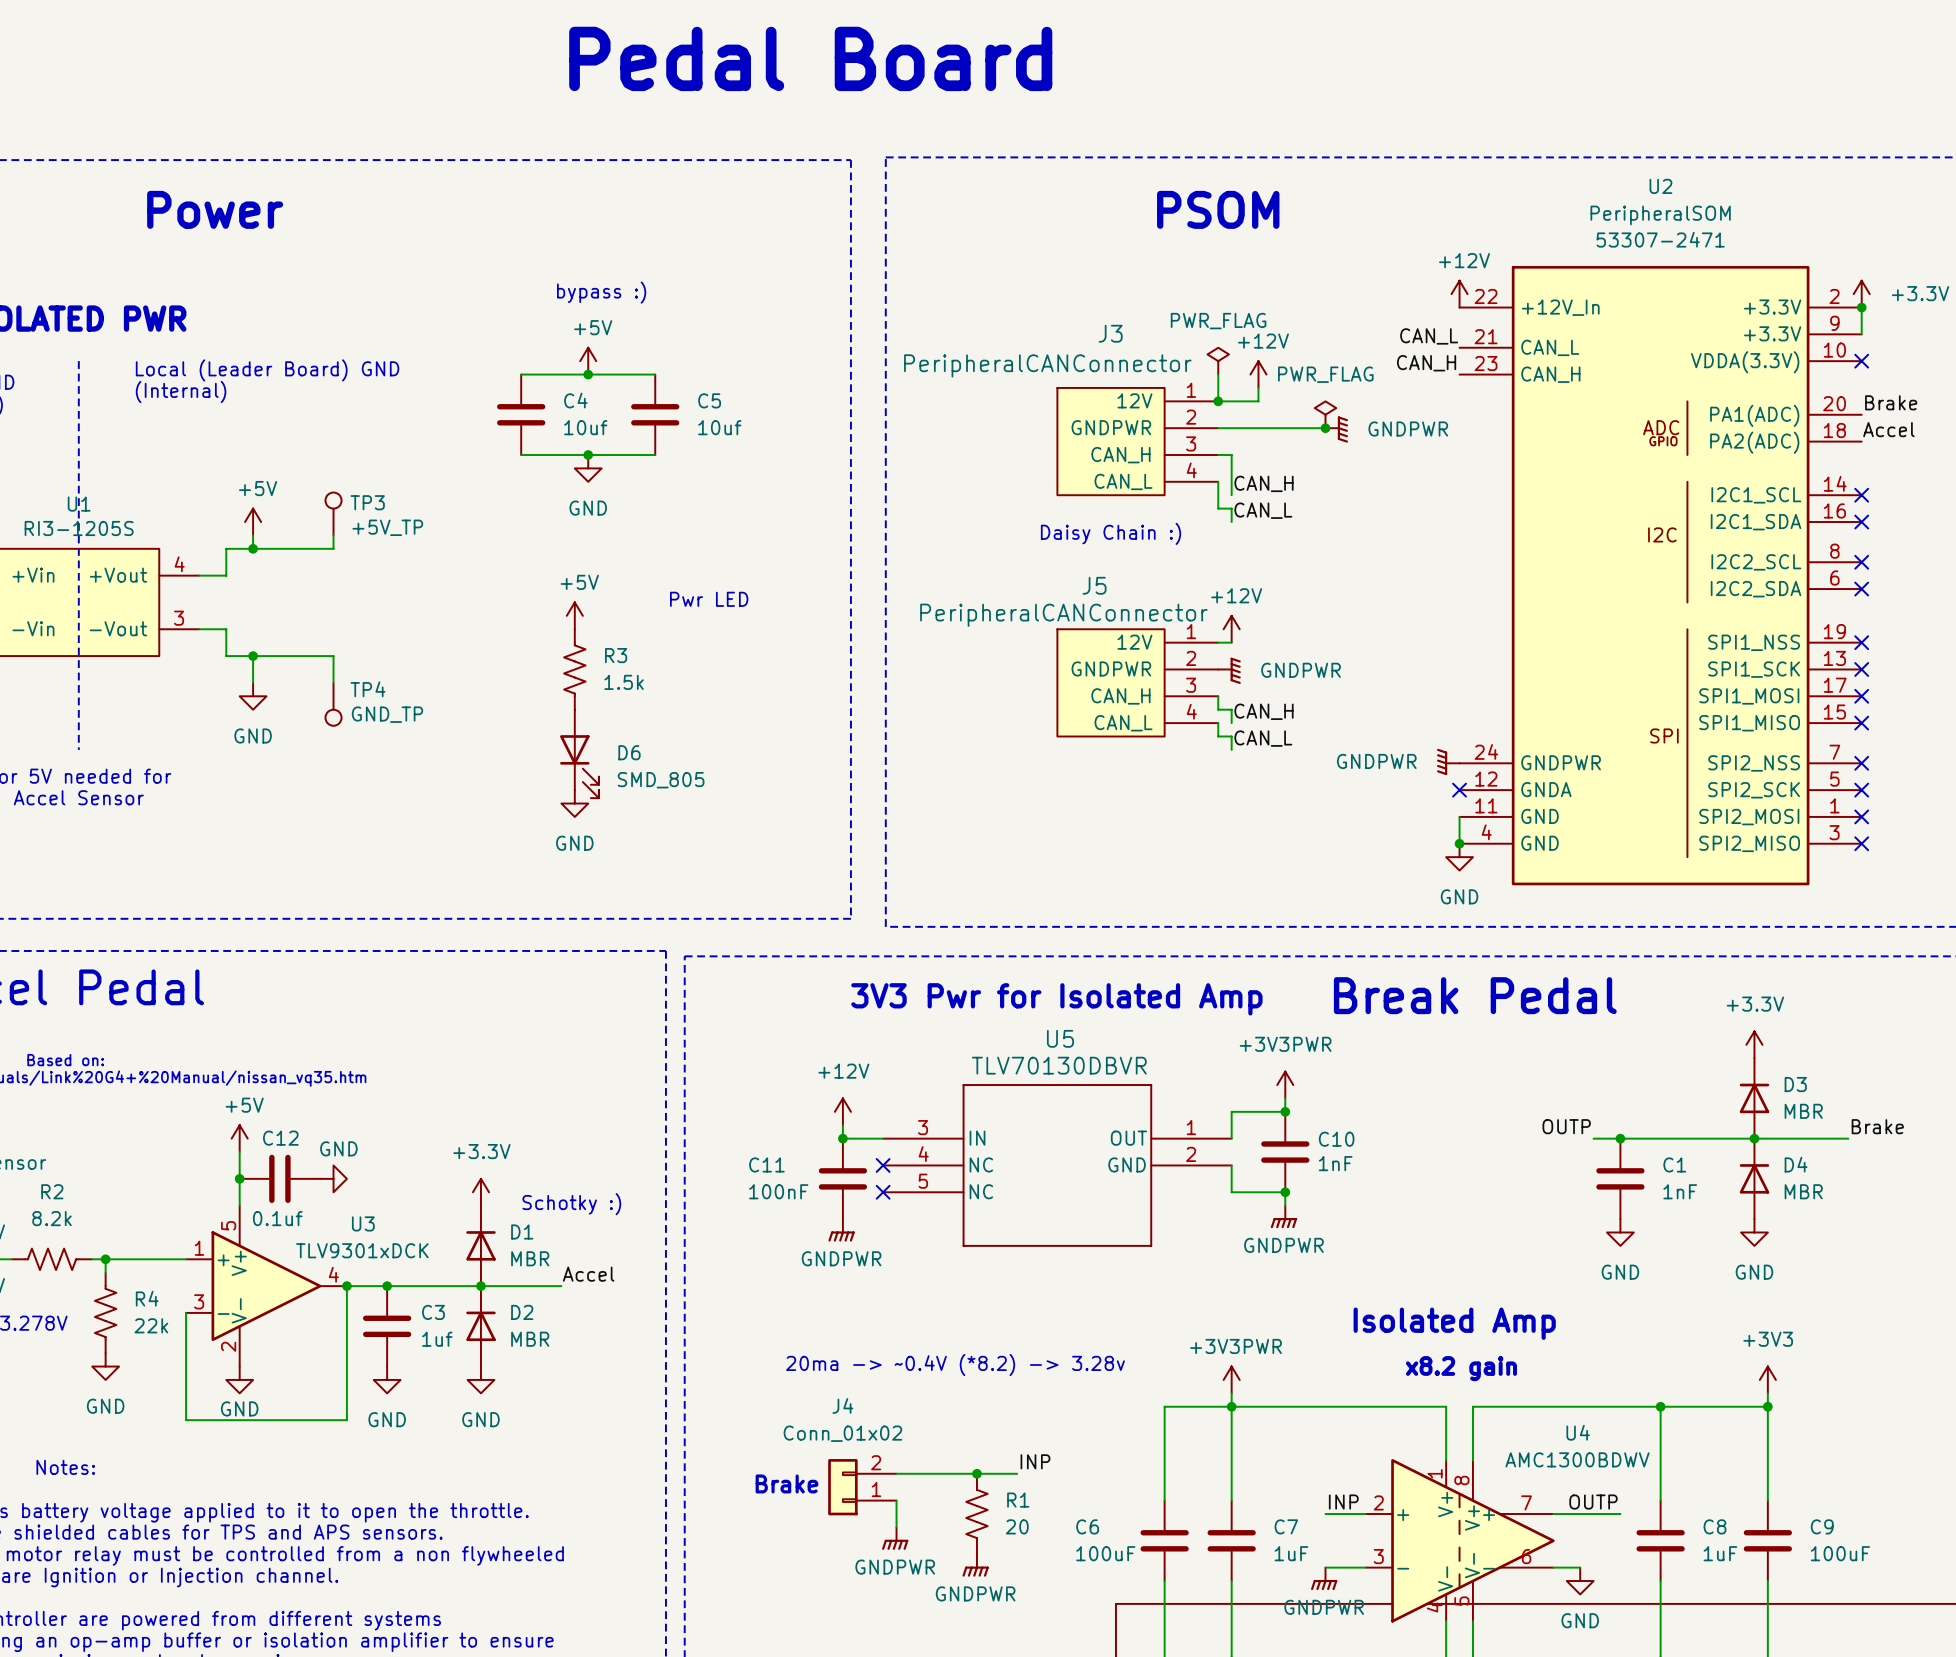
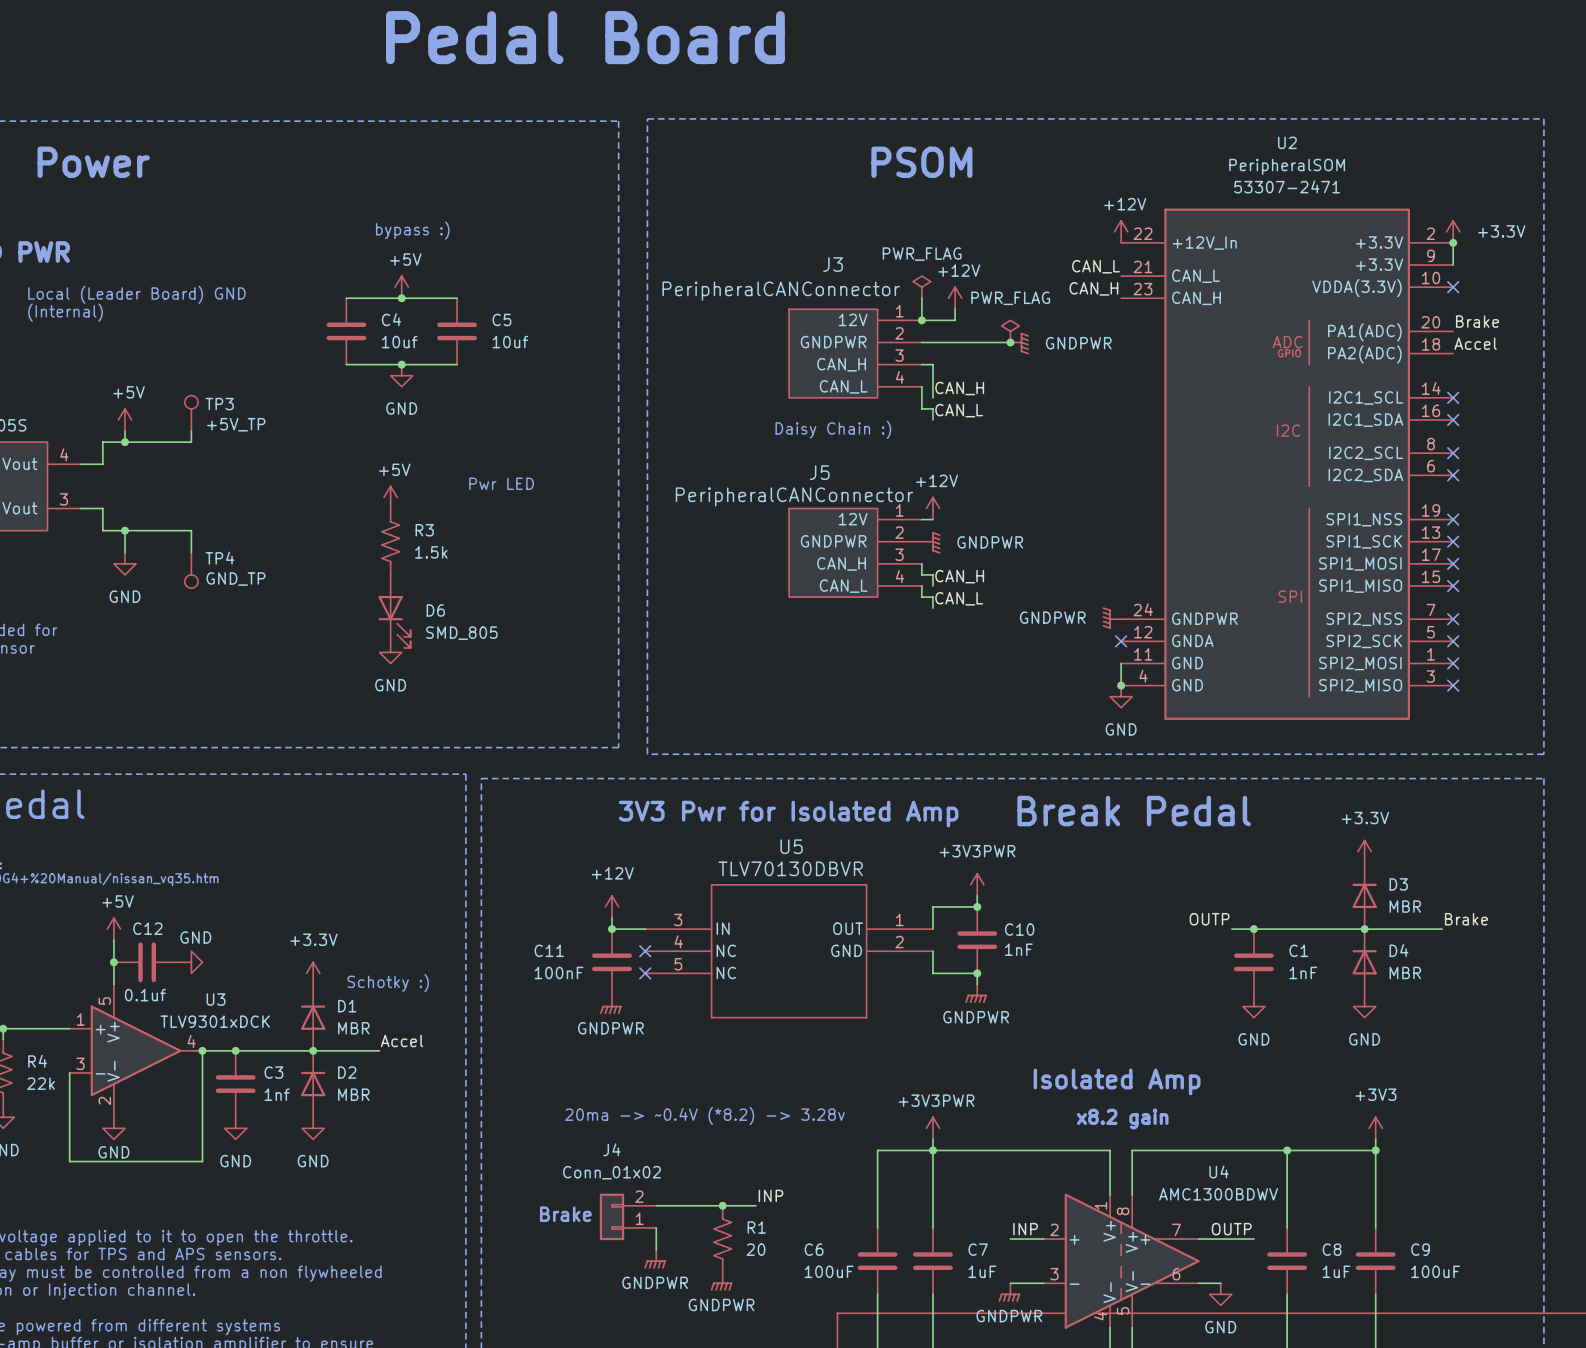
C3 value: 1uf (437, 1339) -> 1nf (277, 1094)

